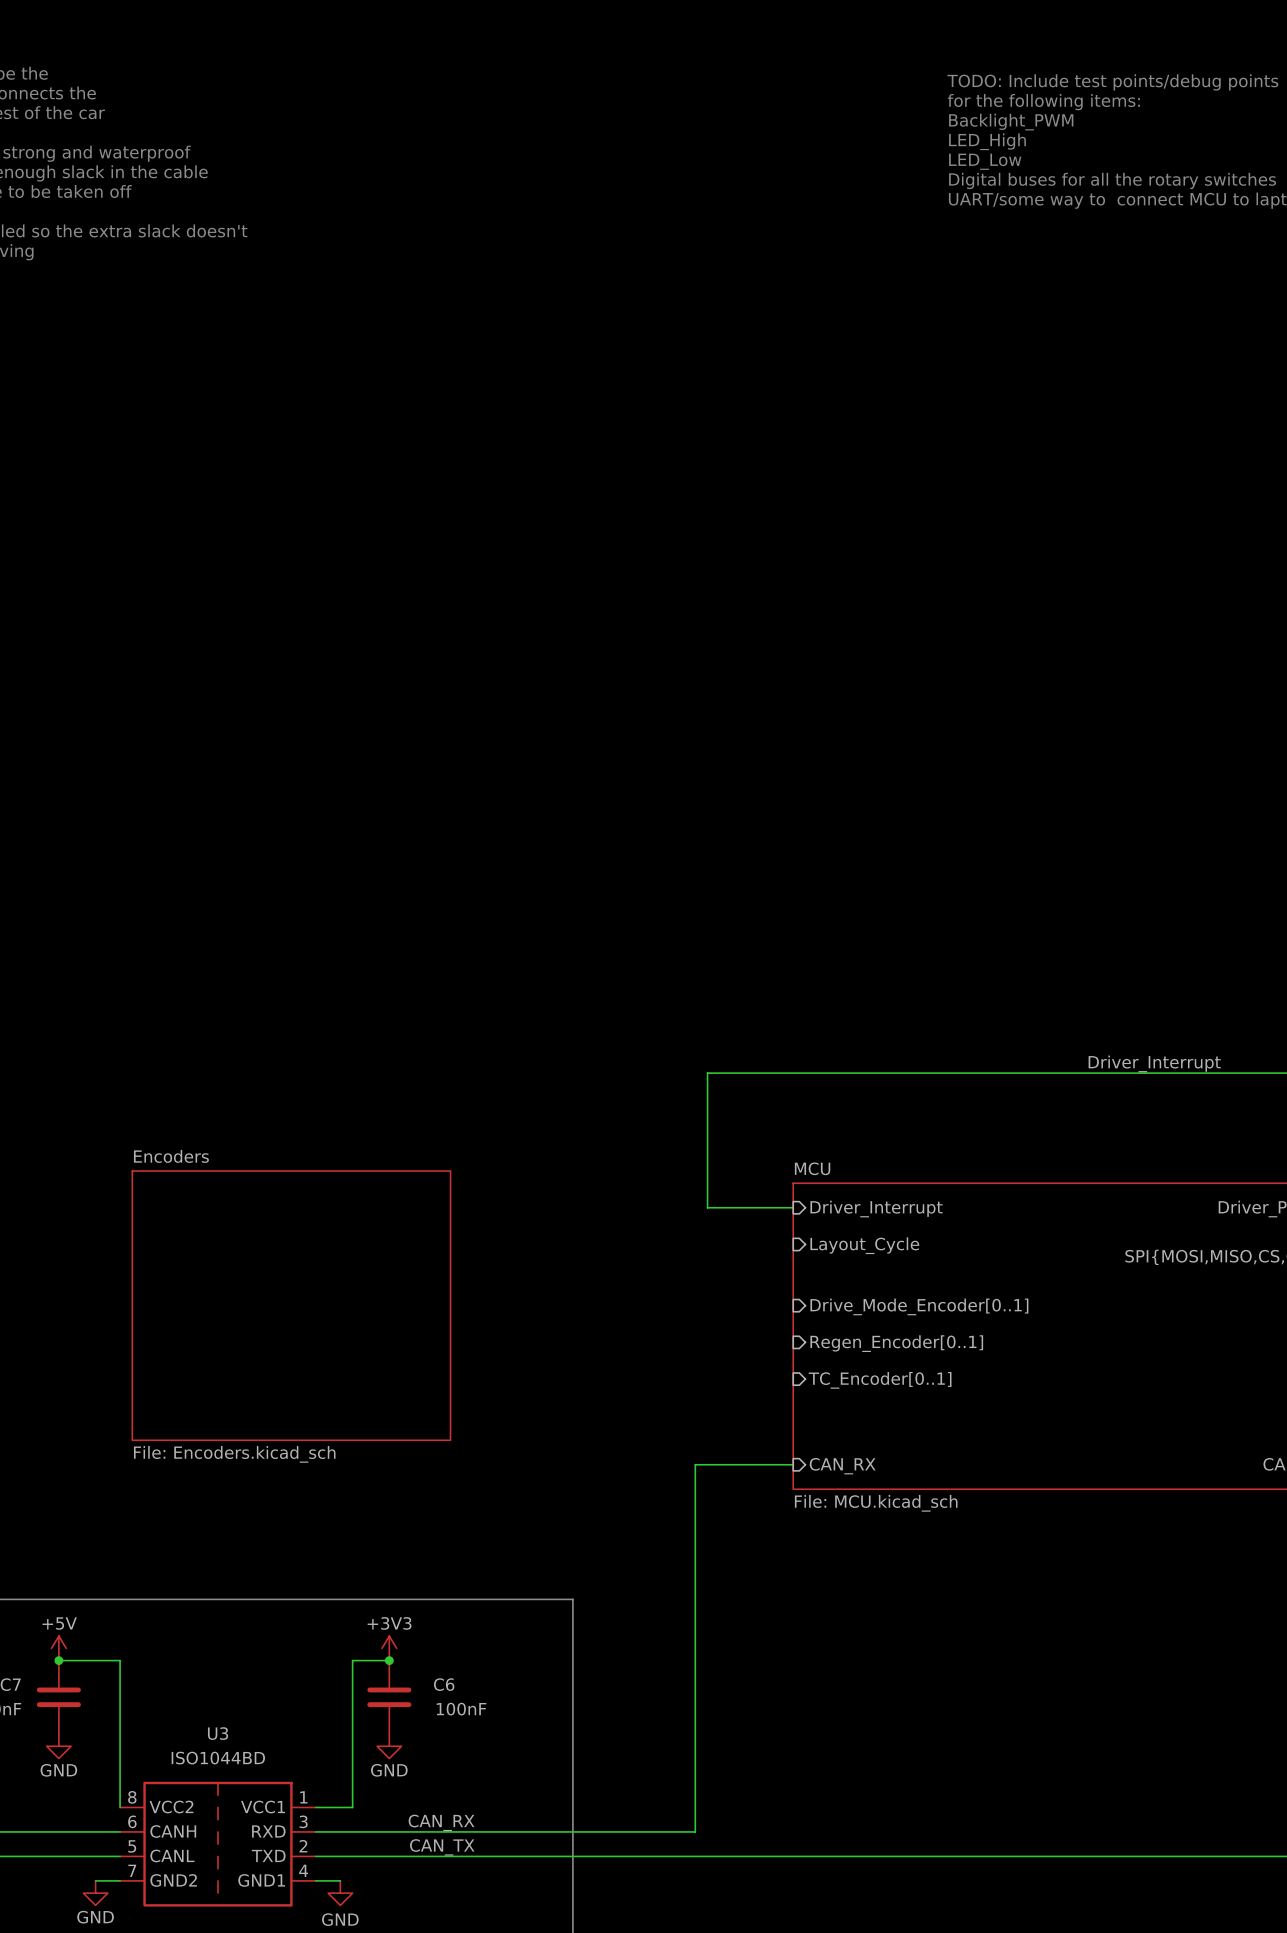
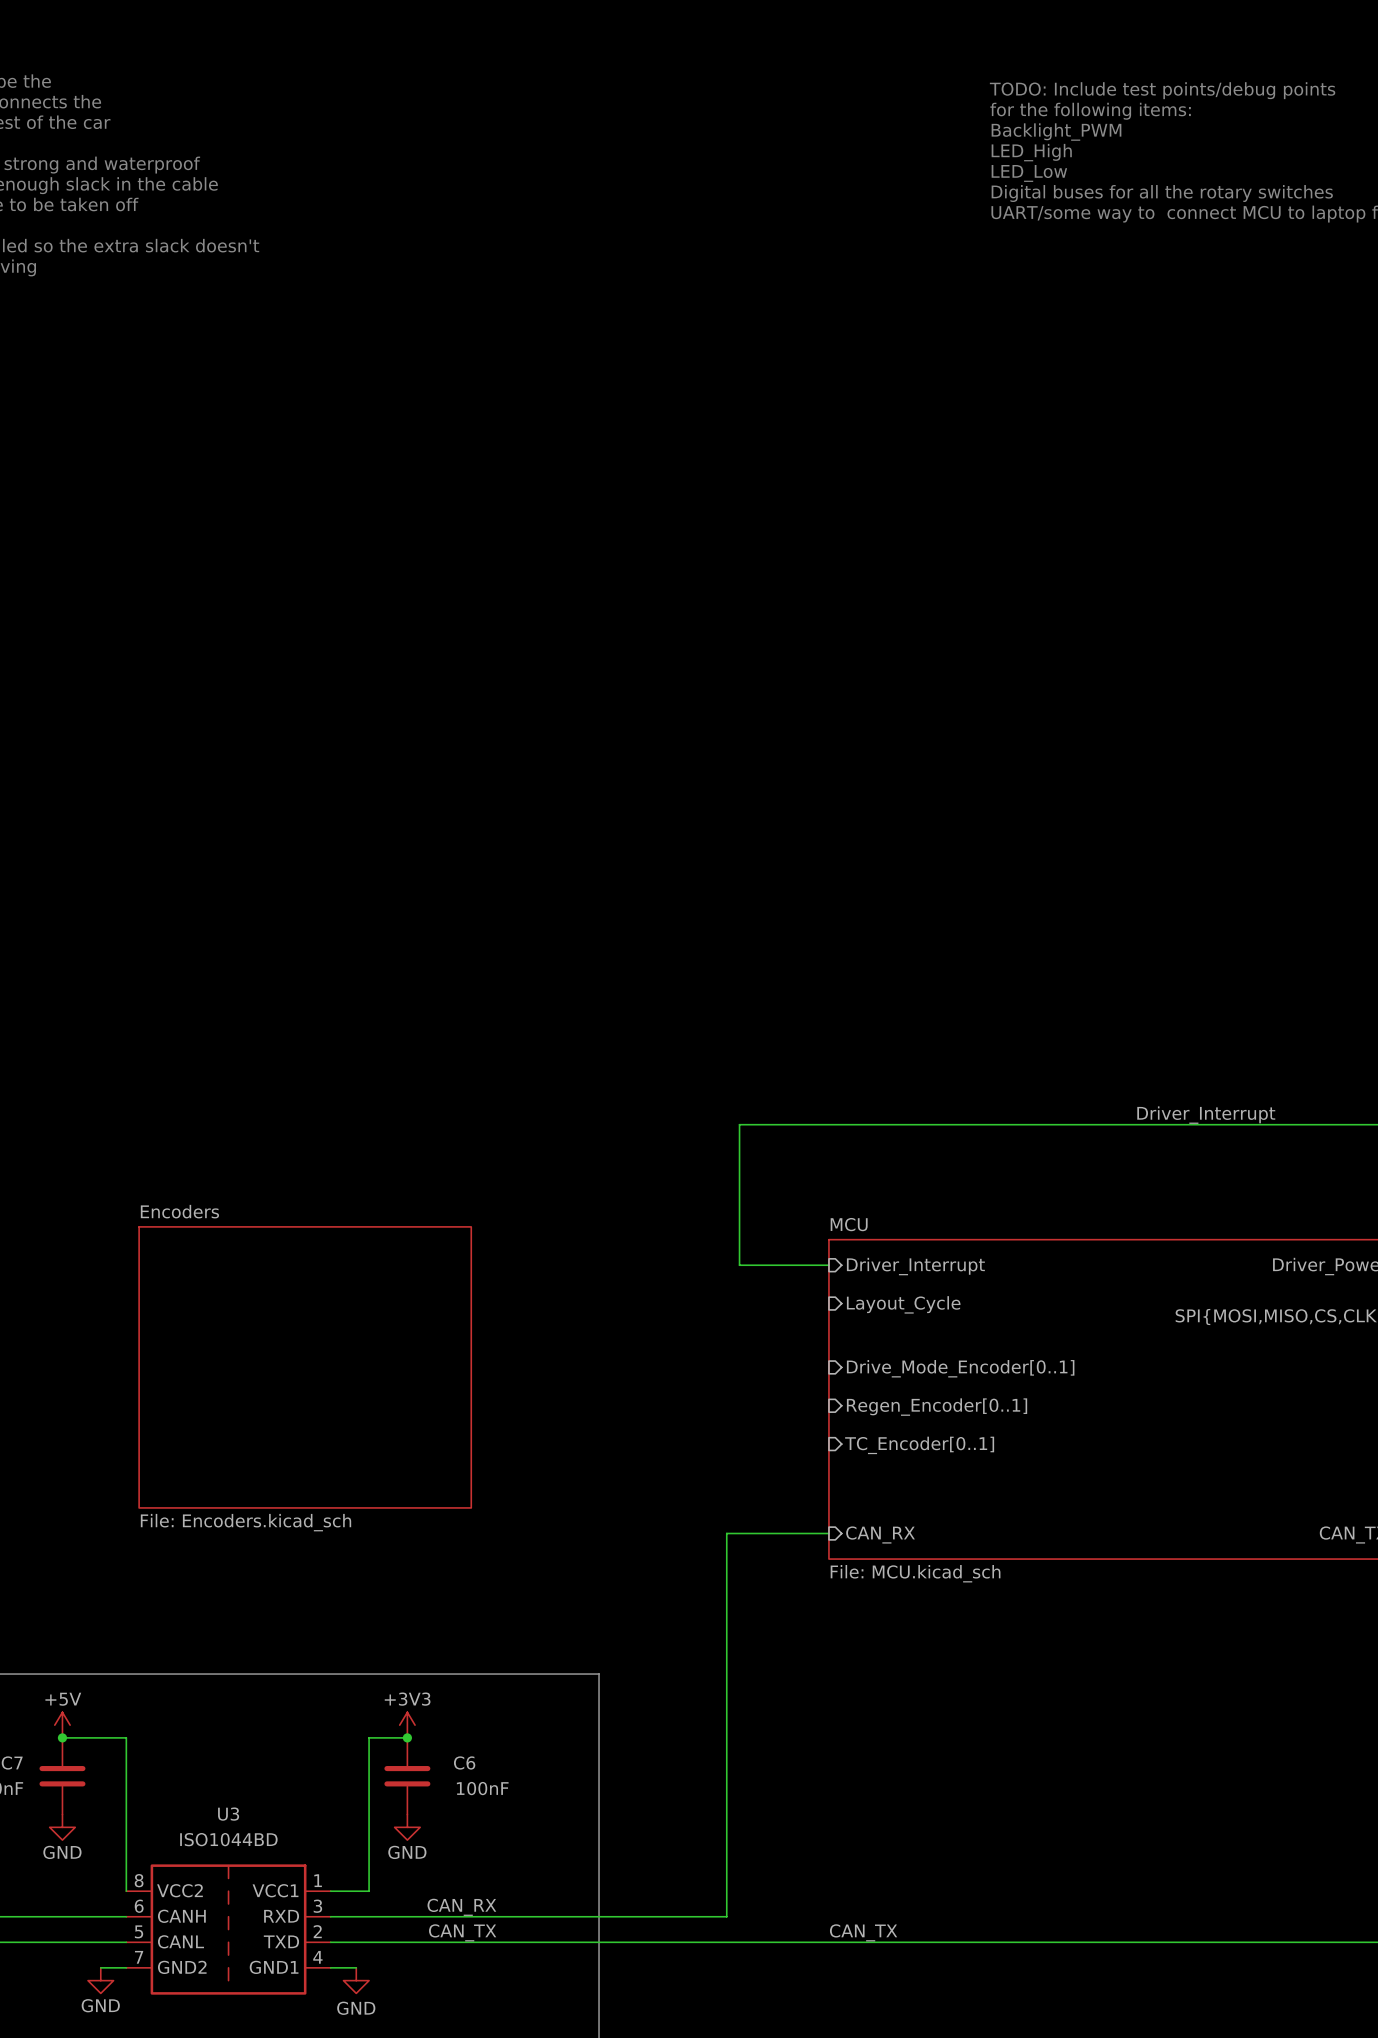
label: none -> CAN_TX (863, 1932)

